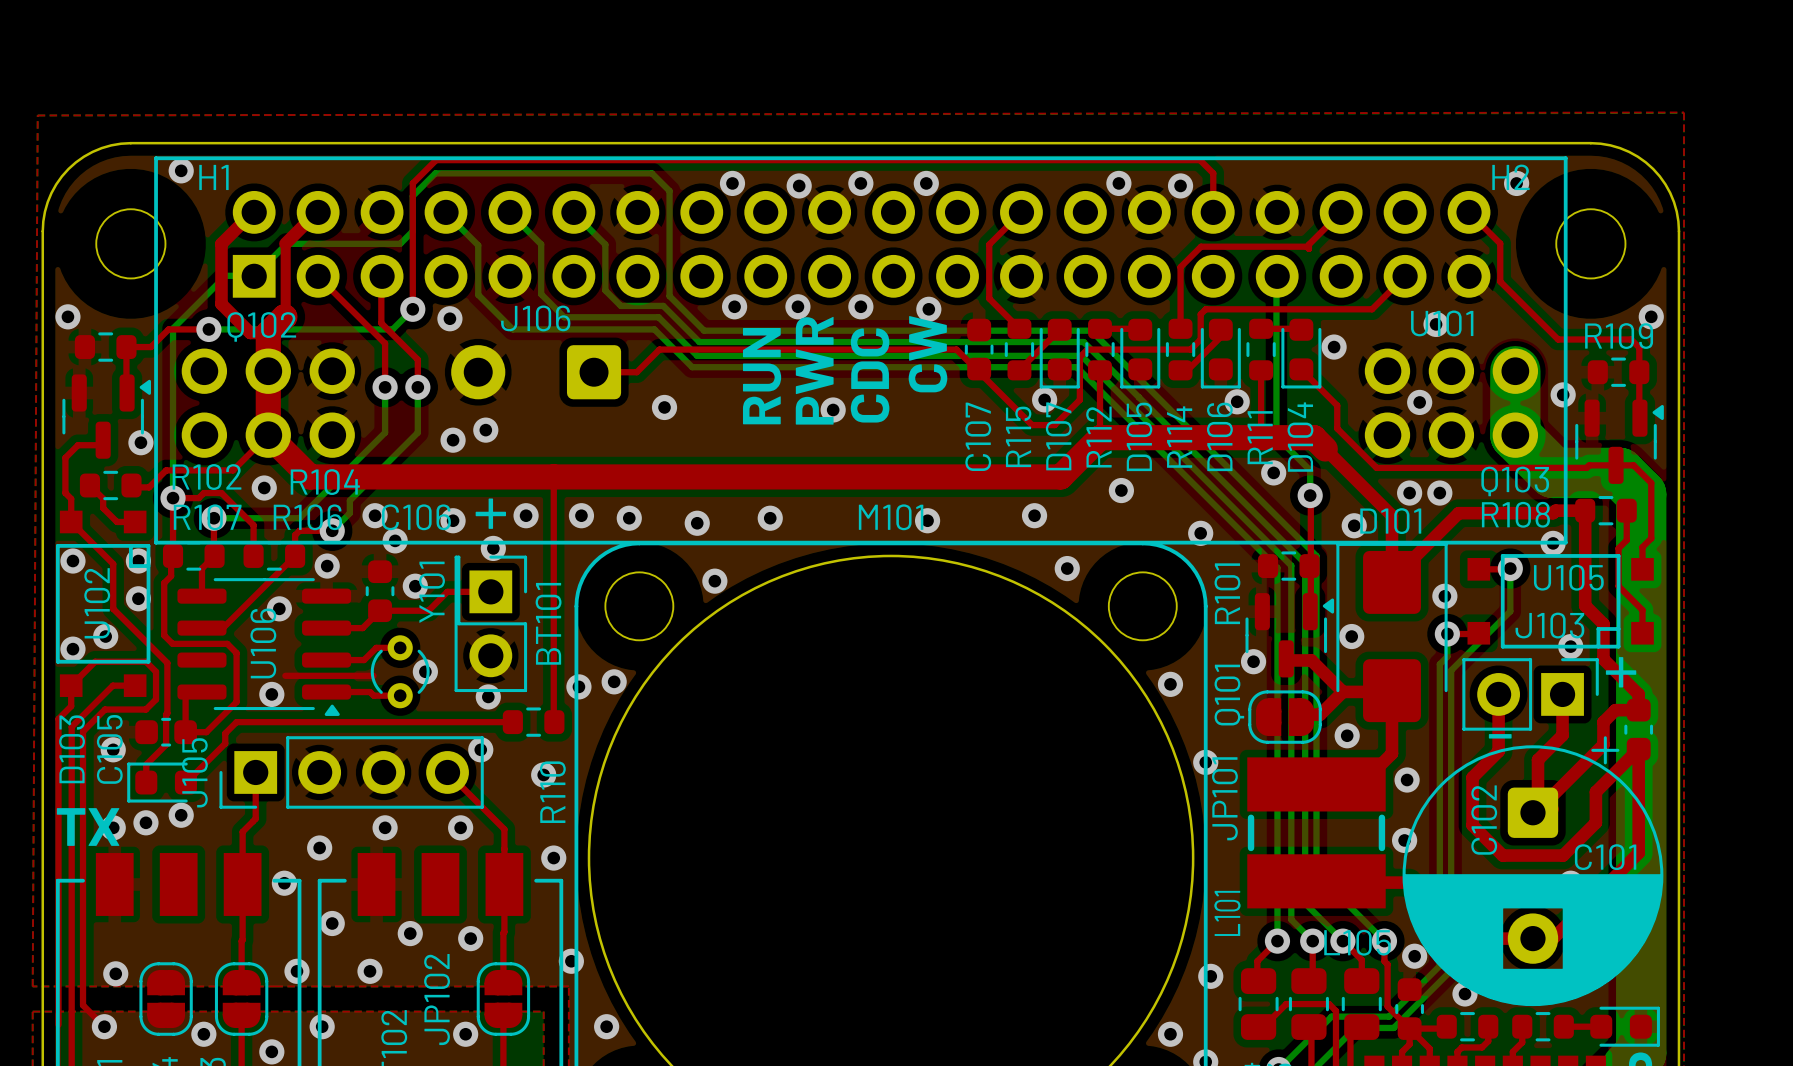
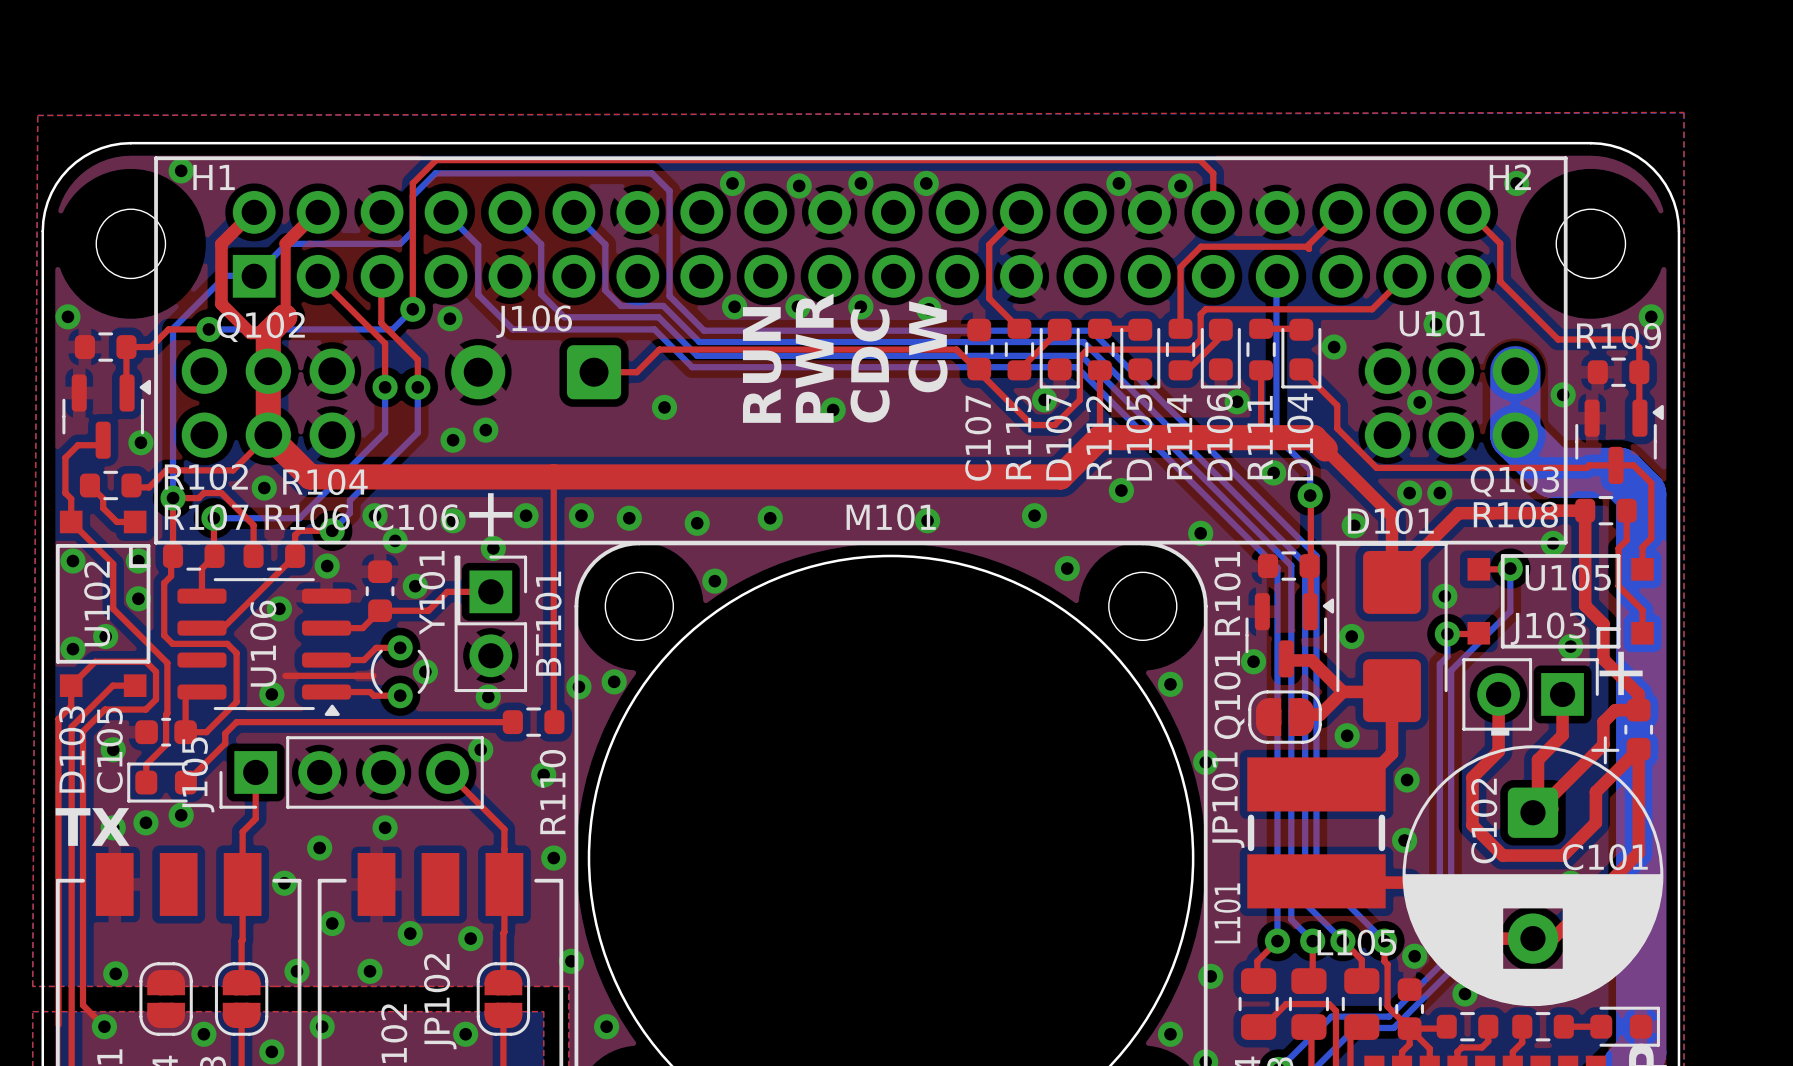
via: (460, 827) -> none

